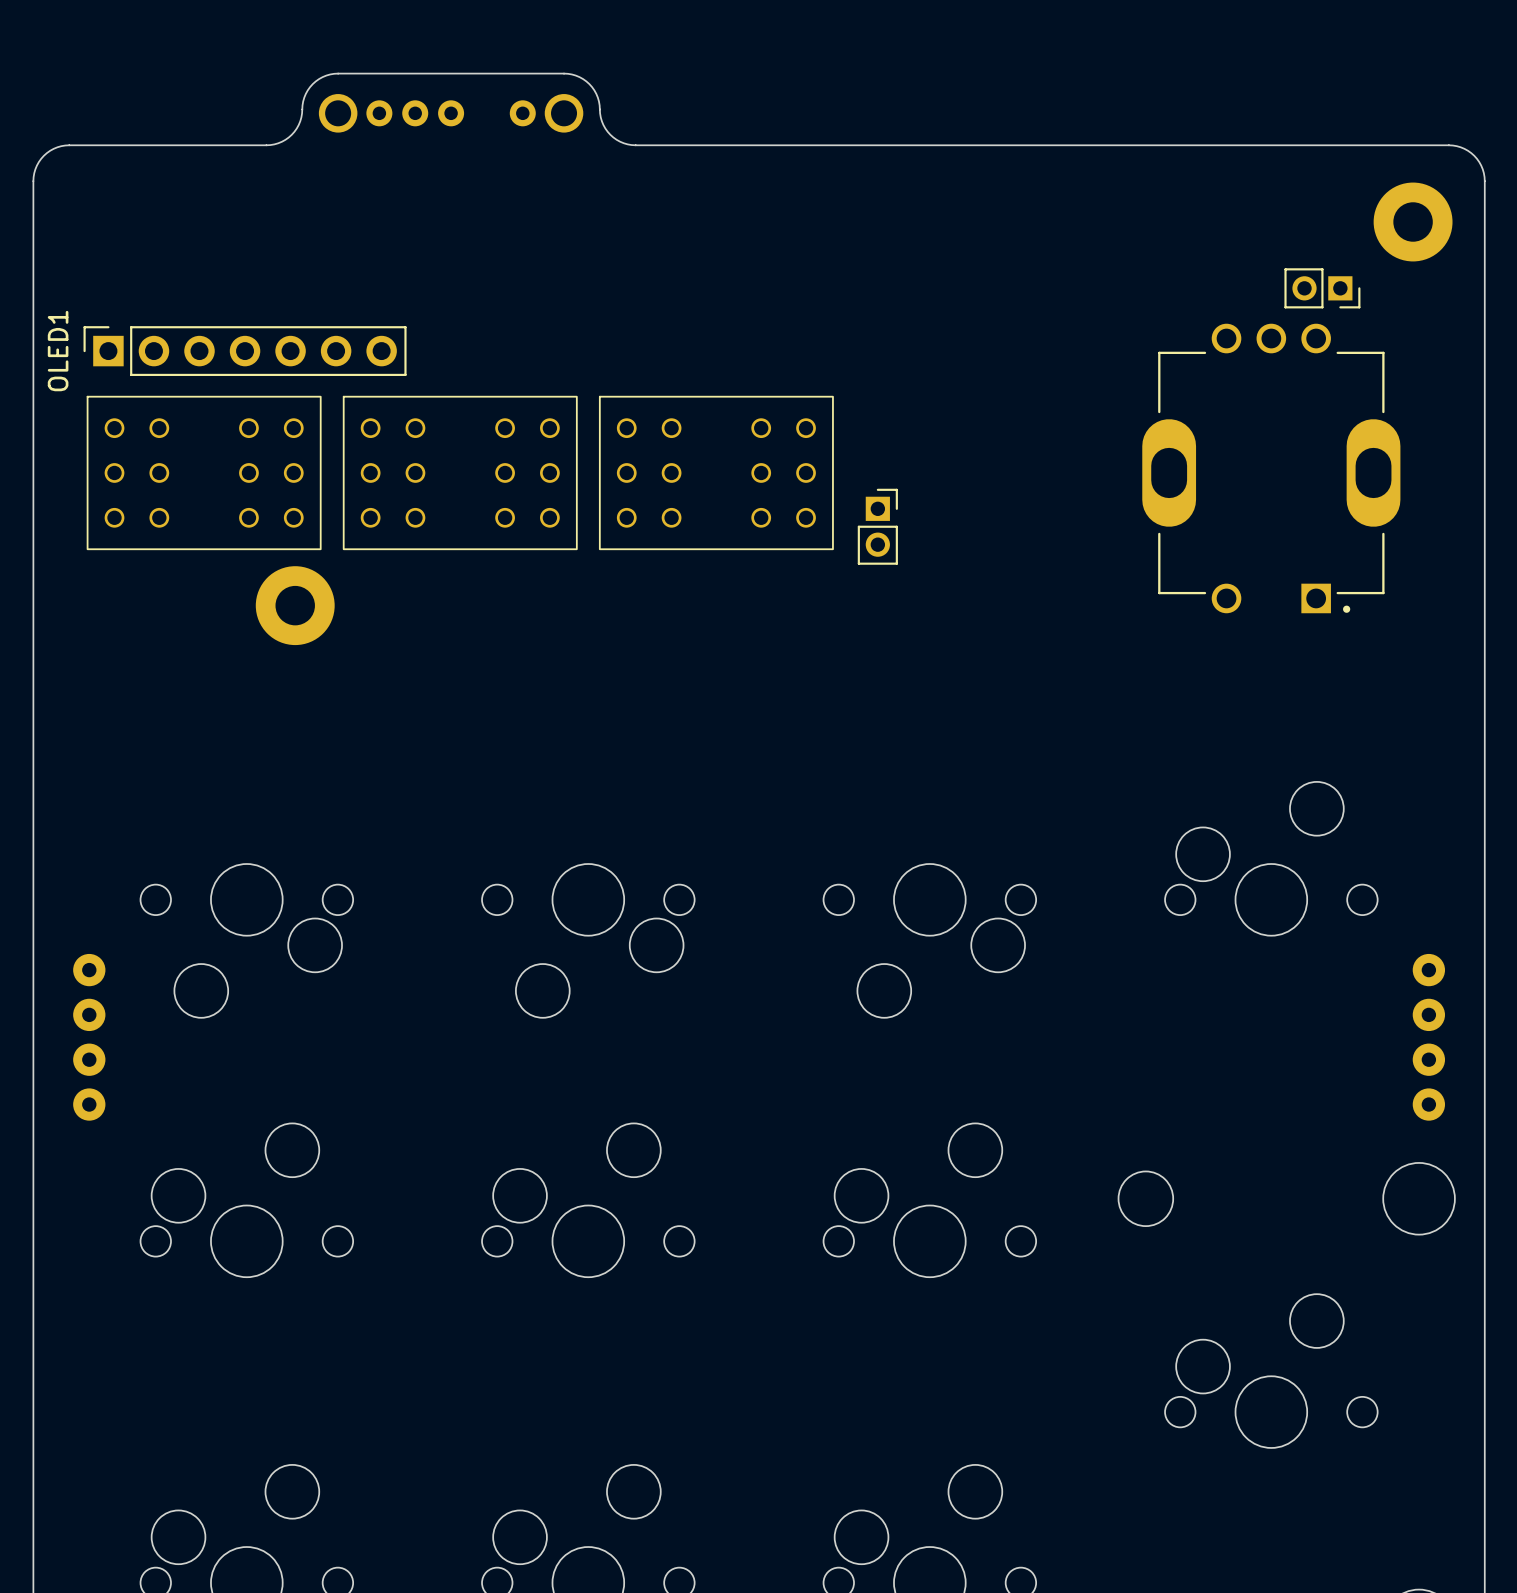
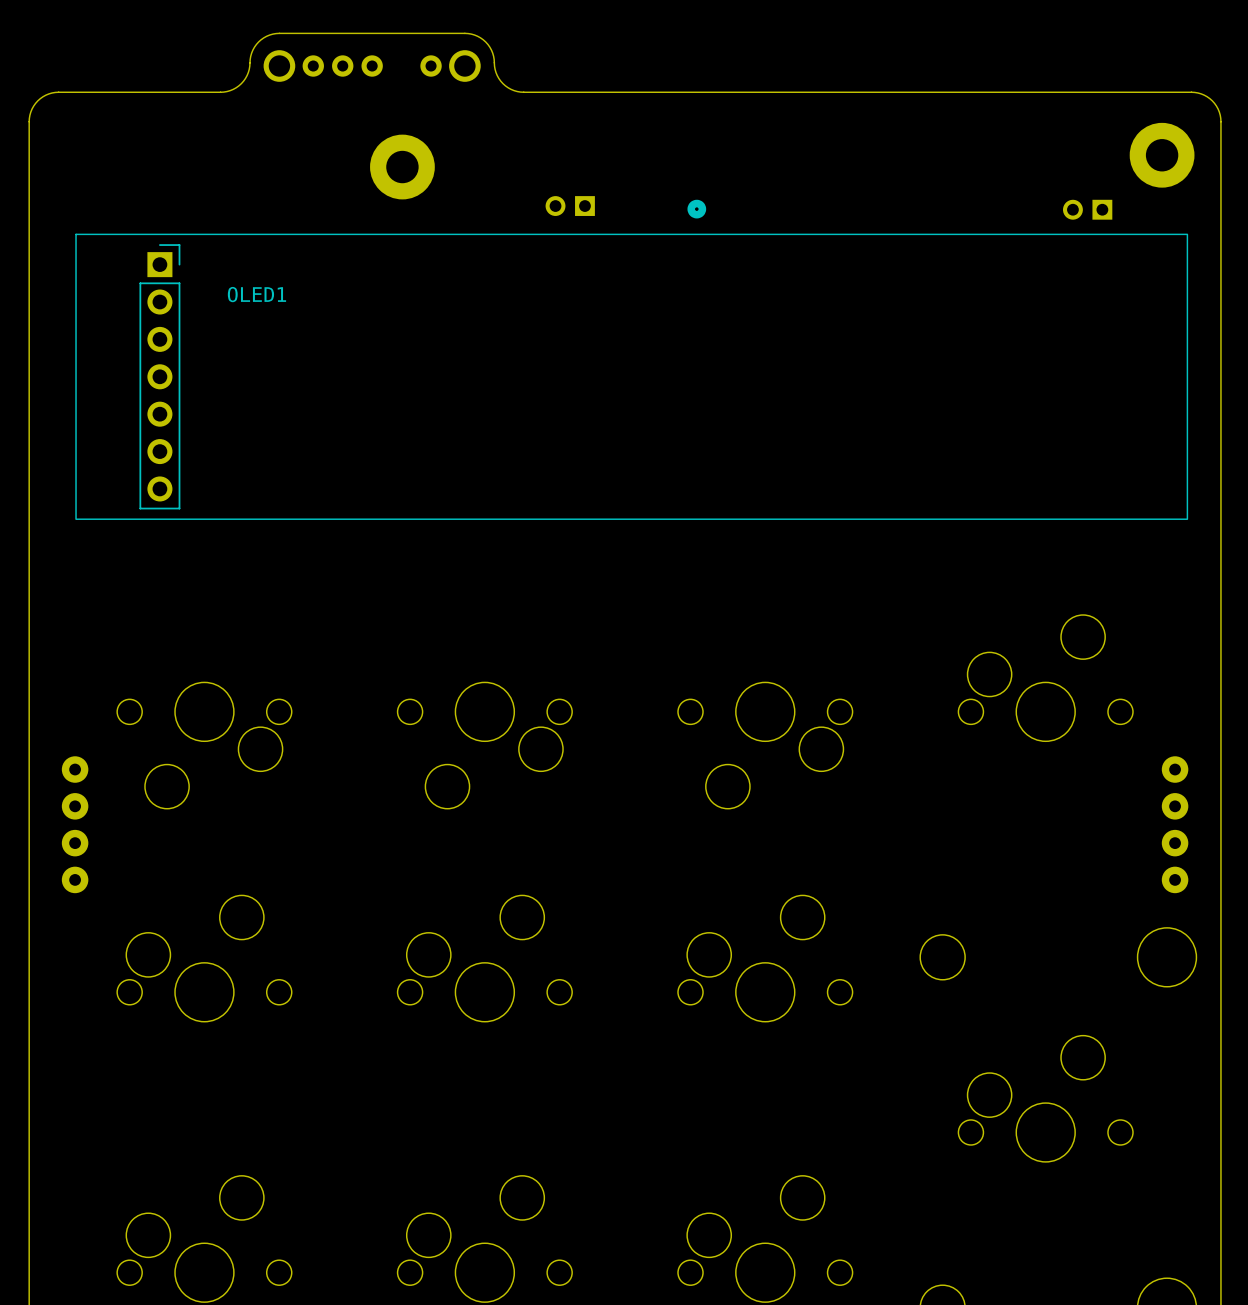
part: none -> (696, 209)
part side: top (1322, 288) -> bottom (1087, 209)
OLED1 footprint: [83, 326, 407, 376] -> [75, 233, 1189, 520]
OLED1 name position: OLED1 (58, 351) -> OLED1 (256, 294)
part: (1271, 468) -> none
part: (204, 472) -> none
part: (460, 472) -> none
part: (716, 472) -> none
part side: top (877, 526) -> bottom (570, 206)
part position: (295, 605) -> (402, 167)

